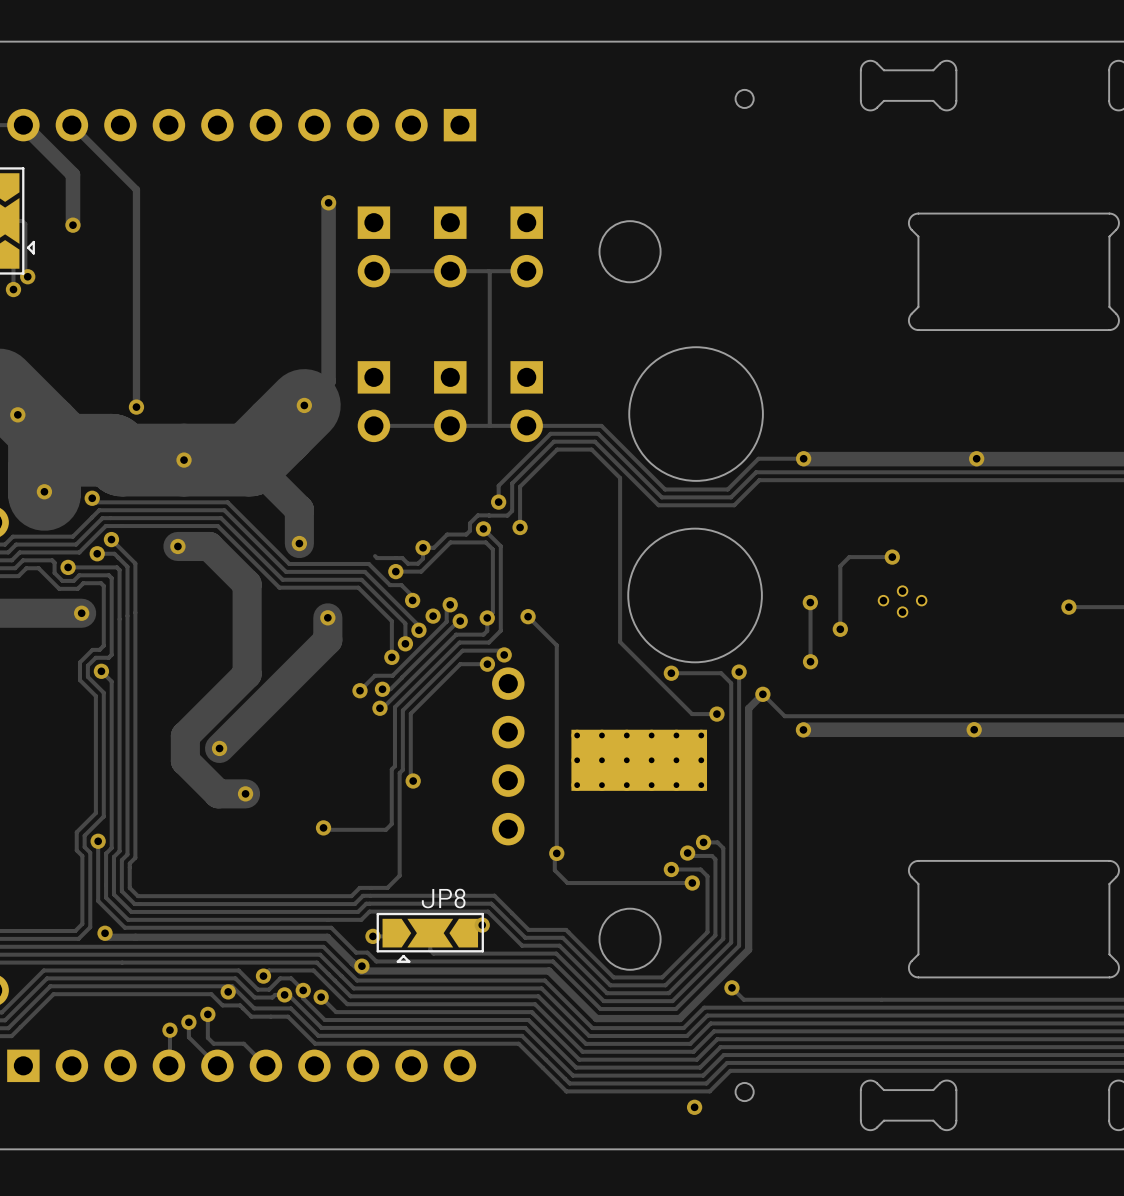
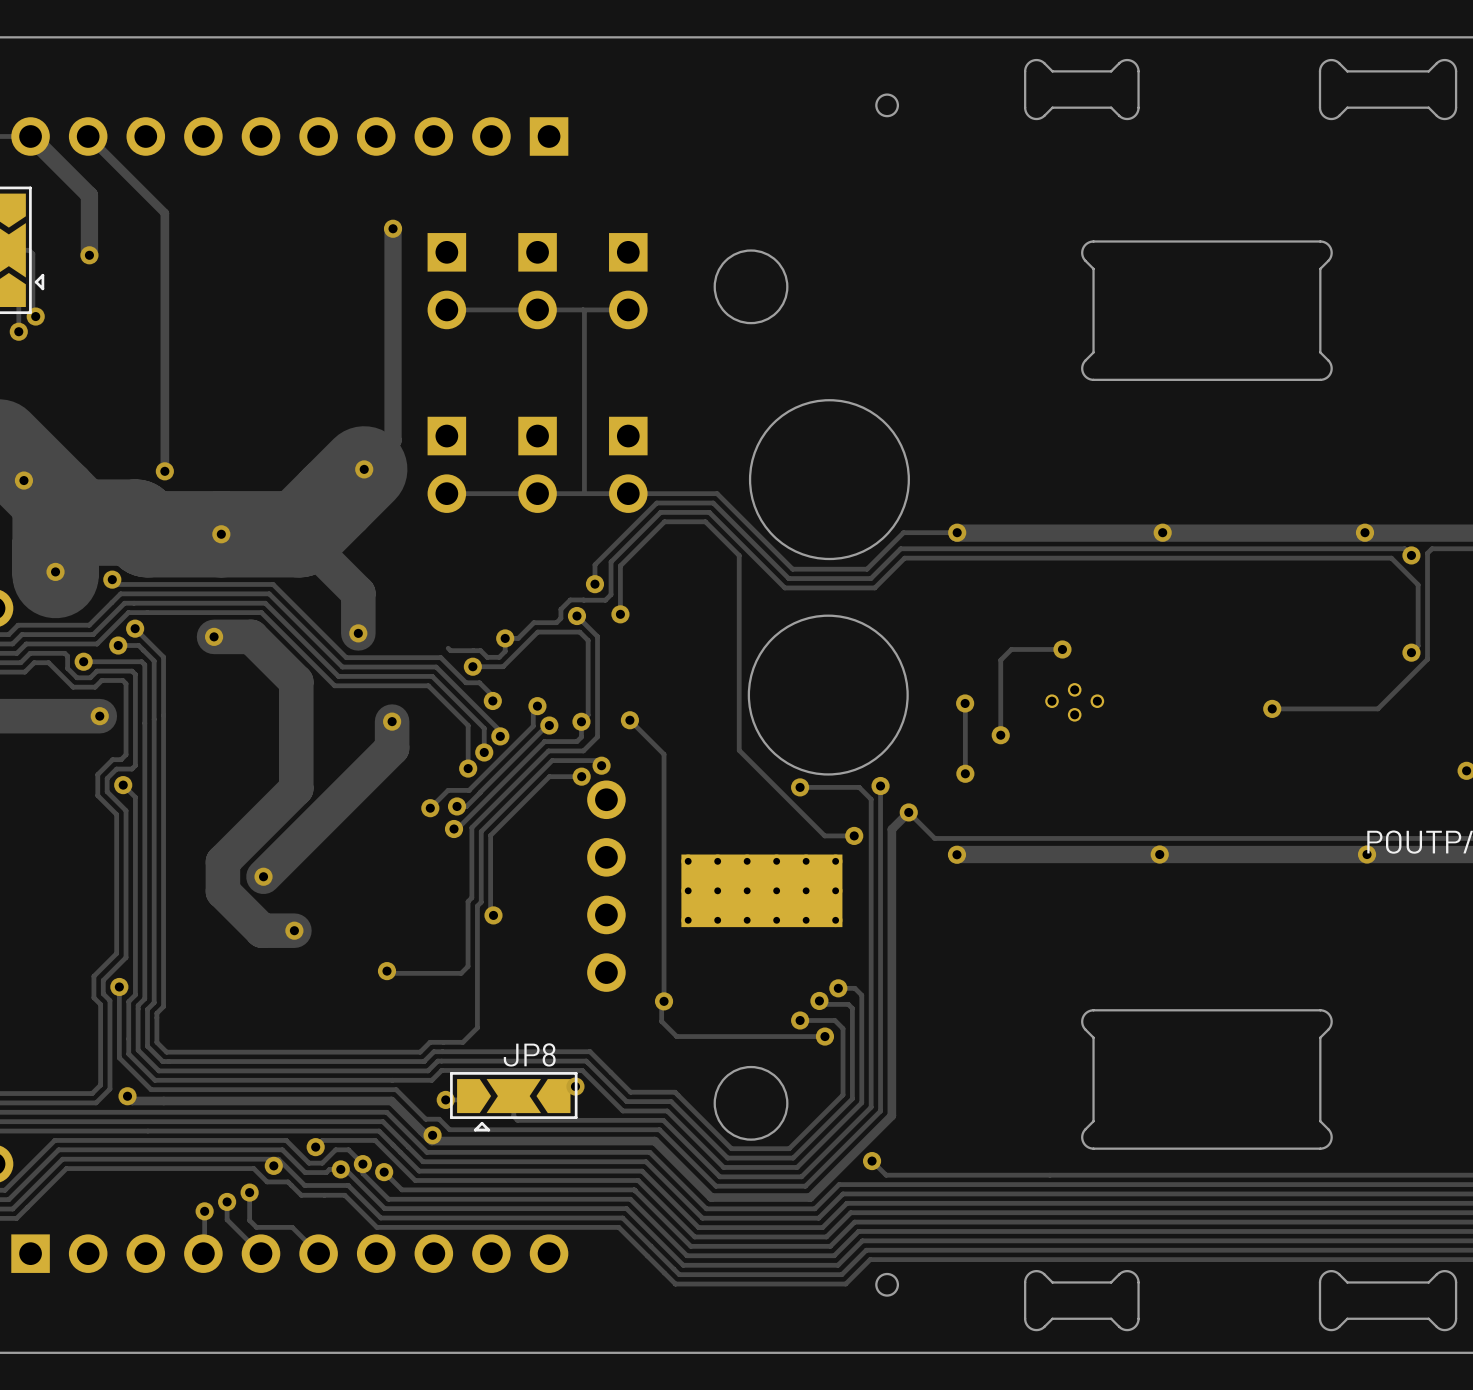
via: (433, 616) -> none
via: (694, 1107) -> none

